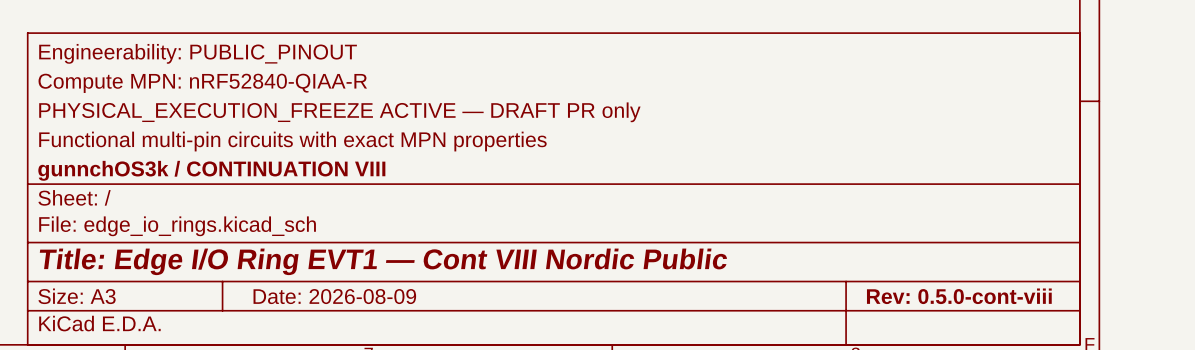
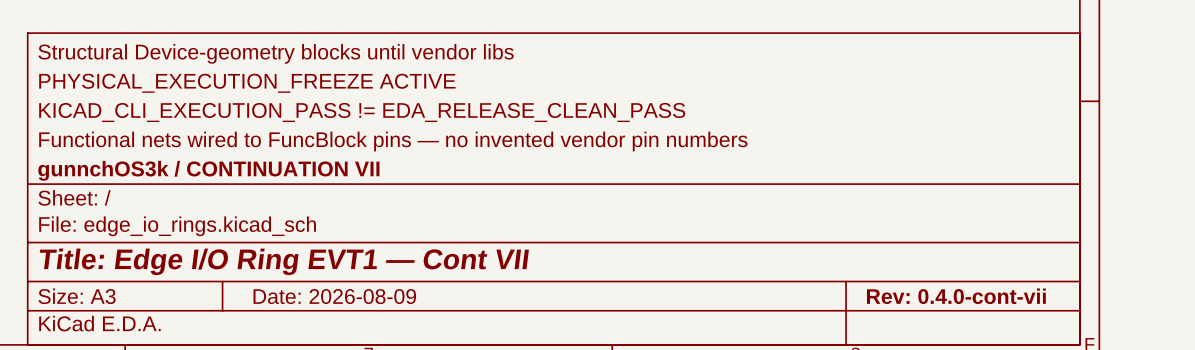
title block: Engineerability: PUBLIC_PINOUT (198, 53) -> Structural Device-geometry blocks until vendor libs (276, 53)
title block: Compute MPN: nRF52840-QIAA-R (202, 83) -> PHYSICAL_EXECUTION_FREEZE ACTIVE (247, 83)
title block: PHYSICAL_EXECUTION_FREEZE ACTIVE — DRAFT PR only (339, 112) -> KICAD_CLI_EXECUTION_PASS != EDA_RELEASE_CLEAN_PASS (362, 112)
title block: Functional multi-pin circuits with exact MPN properties (292, 141) -> Functional nets wired to FuncBlock pins — no invented vendor pin numbers (393, 141)
title block: gunnchOS3k / CONTINUATION VIII (211, 170) -> gunnchOS3k / CONTINUATION VII (208, 170)
title block: Title: Edge I/O Ring EVT1 — Cont VIII Nordic Public (383, 261) -> Title: Edge I/O Ring EVT1 — Cont VII (284, 261)
title block: Rev: 0.5.0-cont-viii (959, 296) -> Rev: 0.4.0-cont-vii (956, 296)

